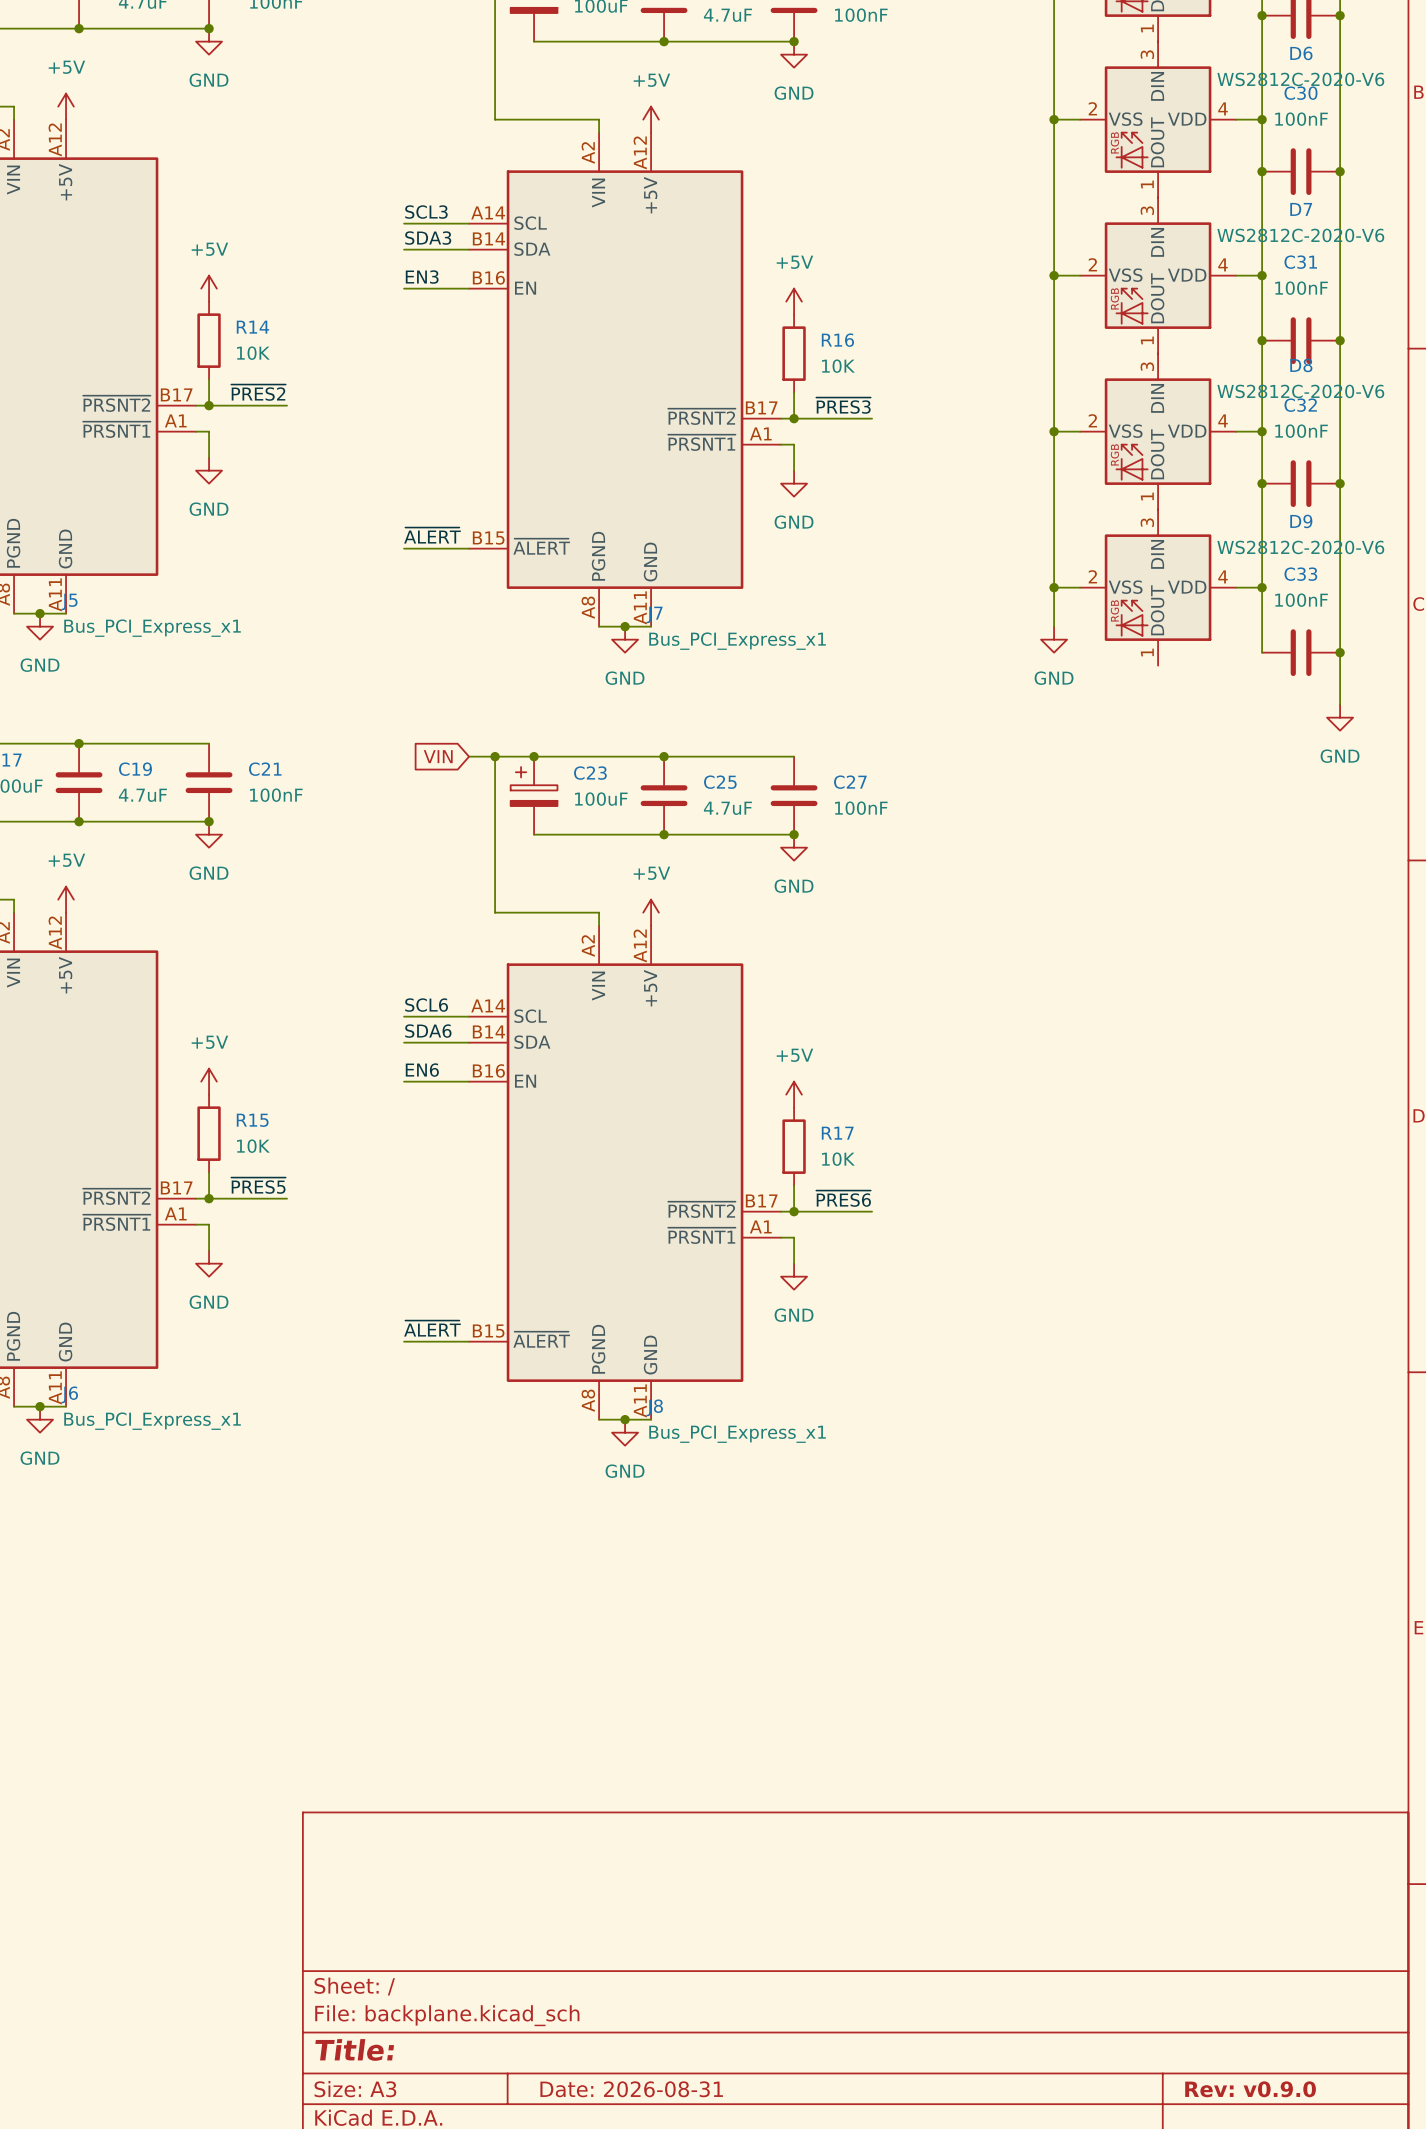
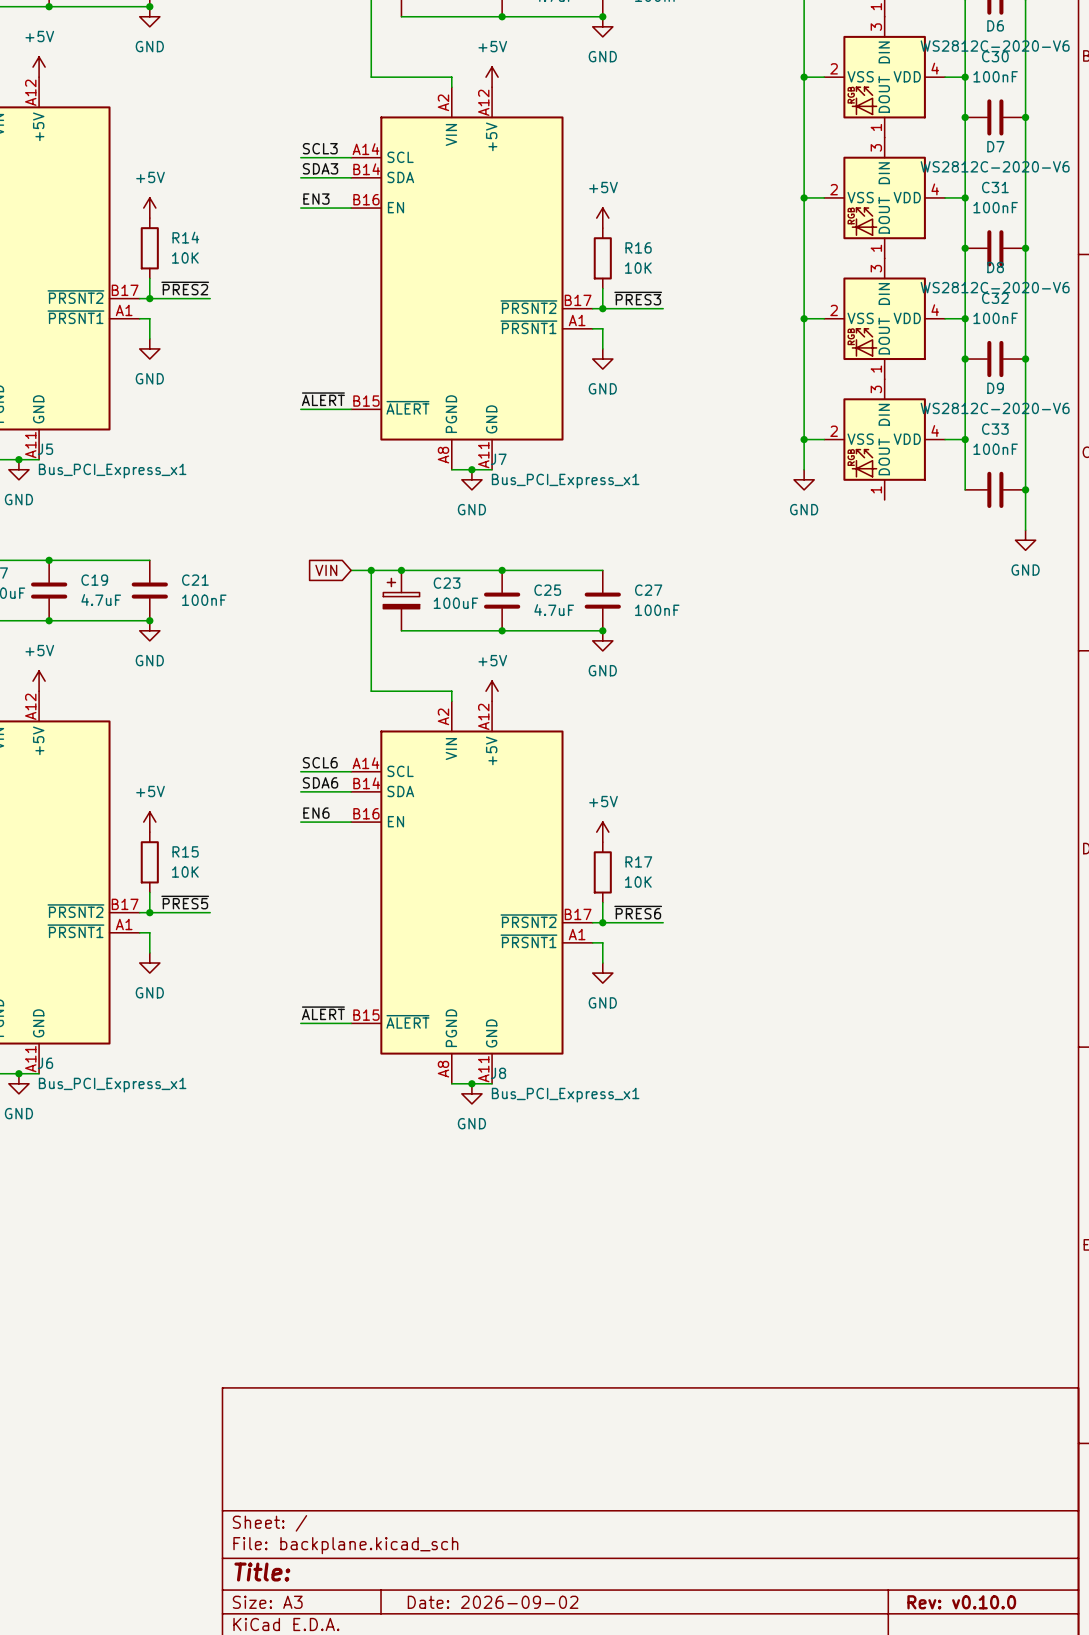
title block: Date: 2026-08-31 (631, 2089) -> Date: 2026-09-02 (493, 1602)
title block: Rev: v0.9.0 (1250, 2089) -> Rev: v0.10.0 (961, 1602)

